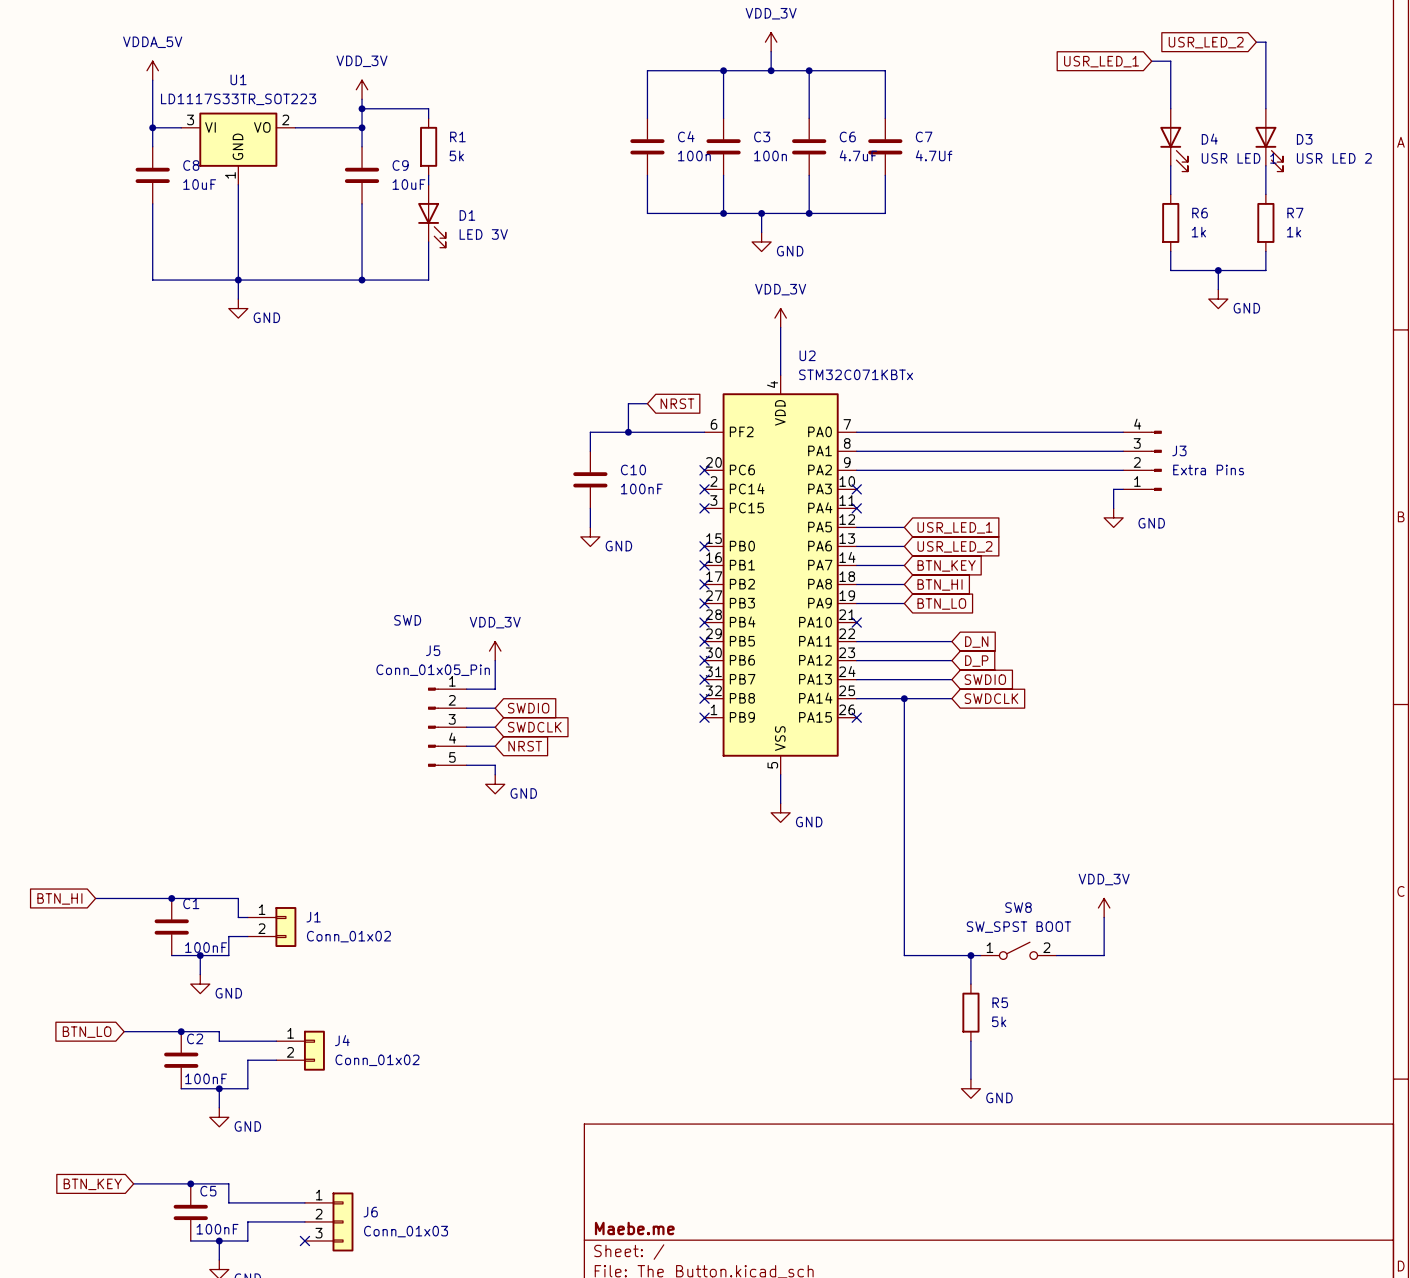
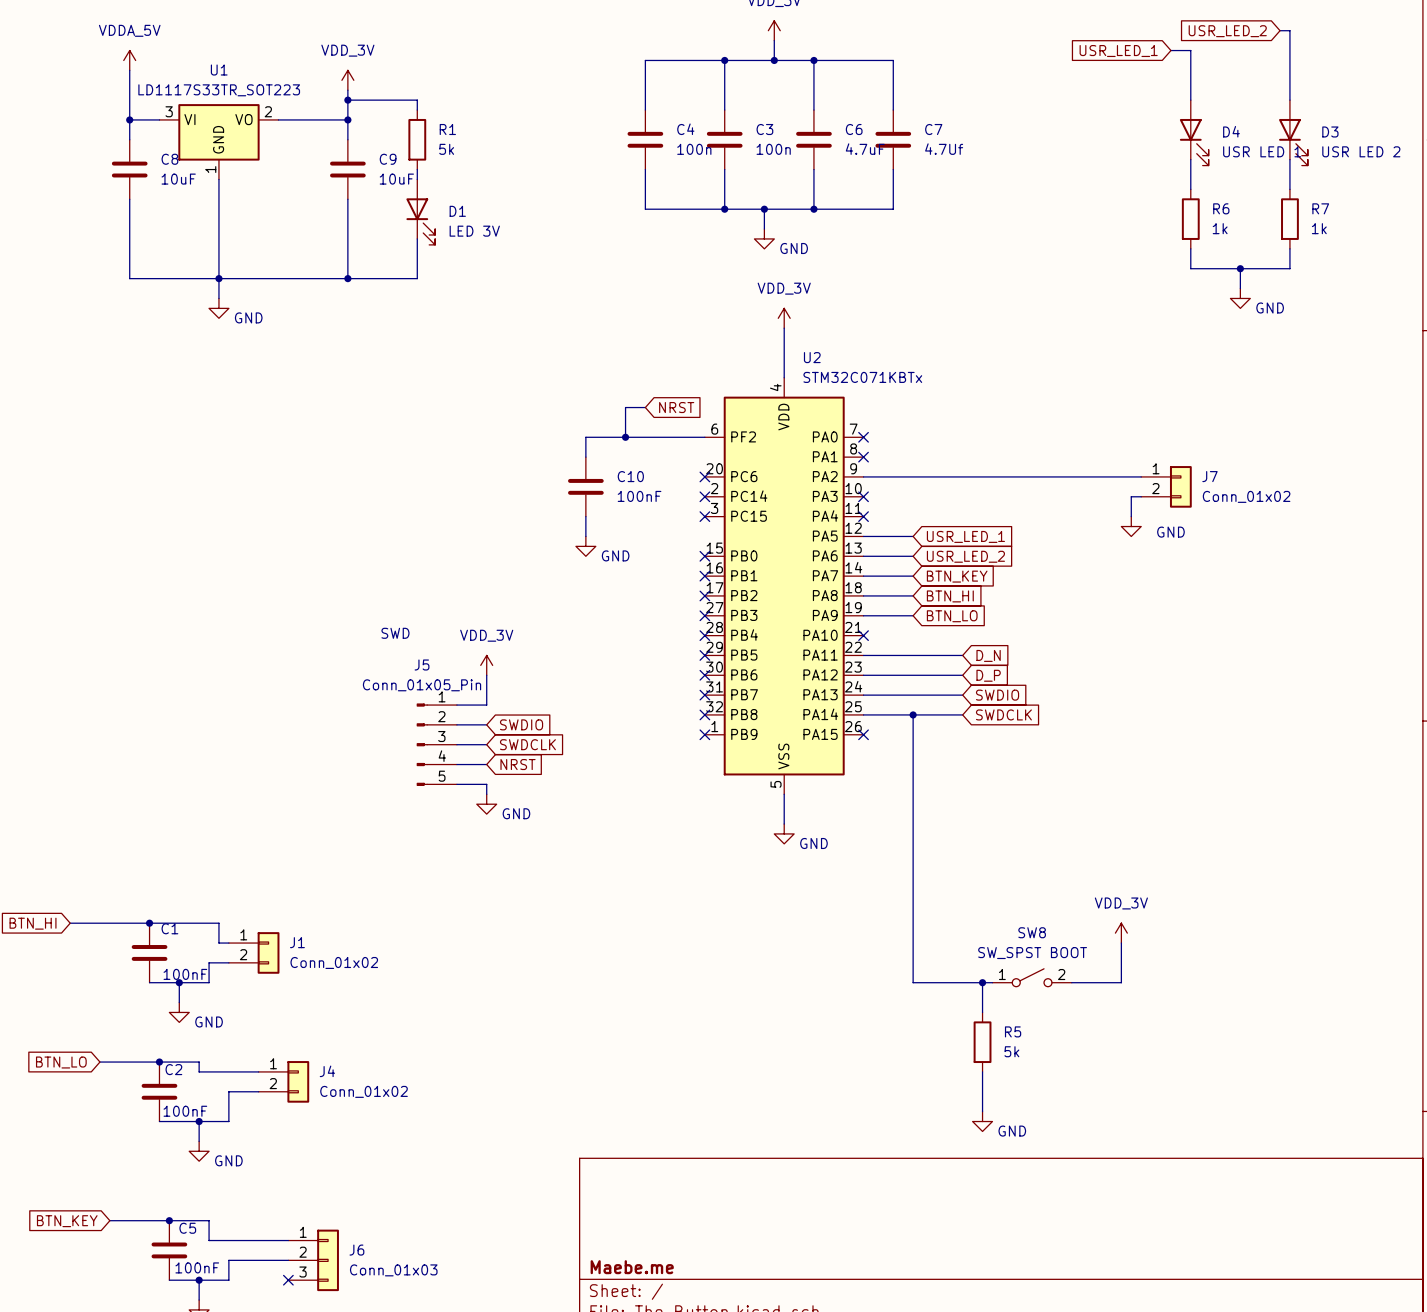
wire: (856, 432) (1123, 432) -> none
no-connect mark: none -> (863, 437)
wire: (856, 451) (1123, 451) -> none
no-connect mark: none -> (863, 457)
J3: Extra Pins (1142, 460) -> none
J7: none -> Conn_01x02 (1166, 486)

